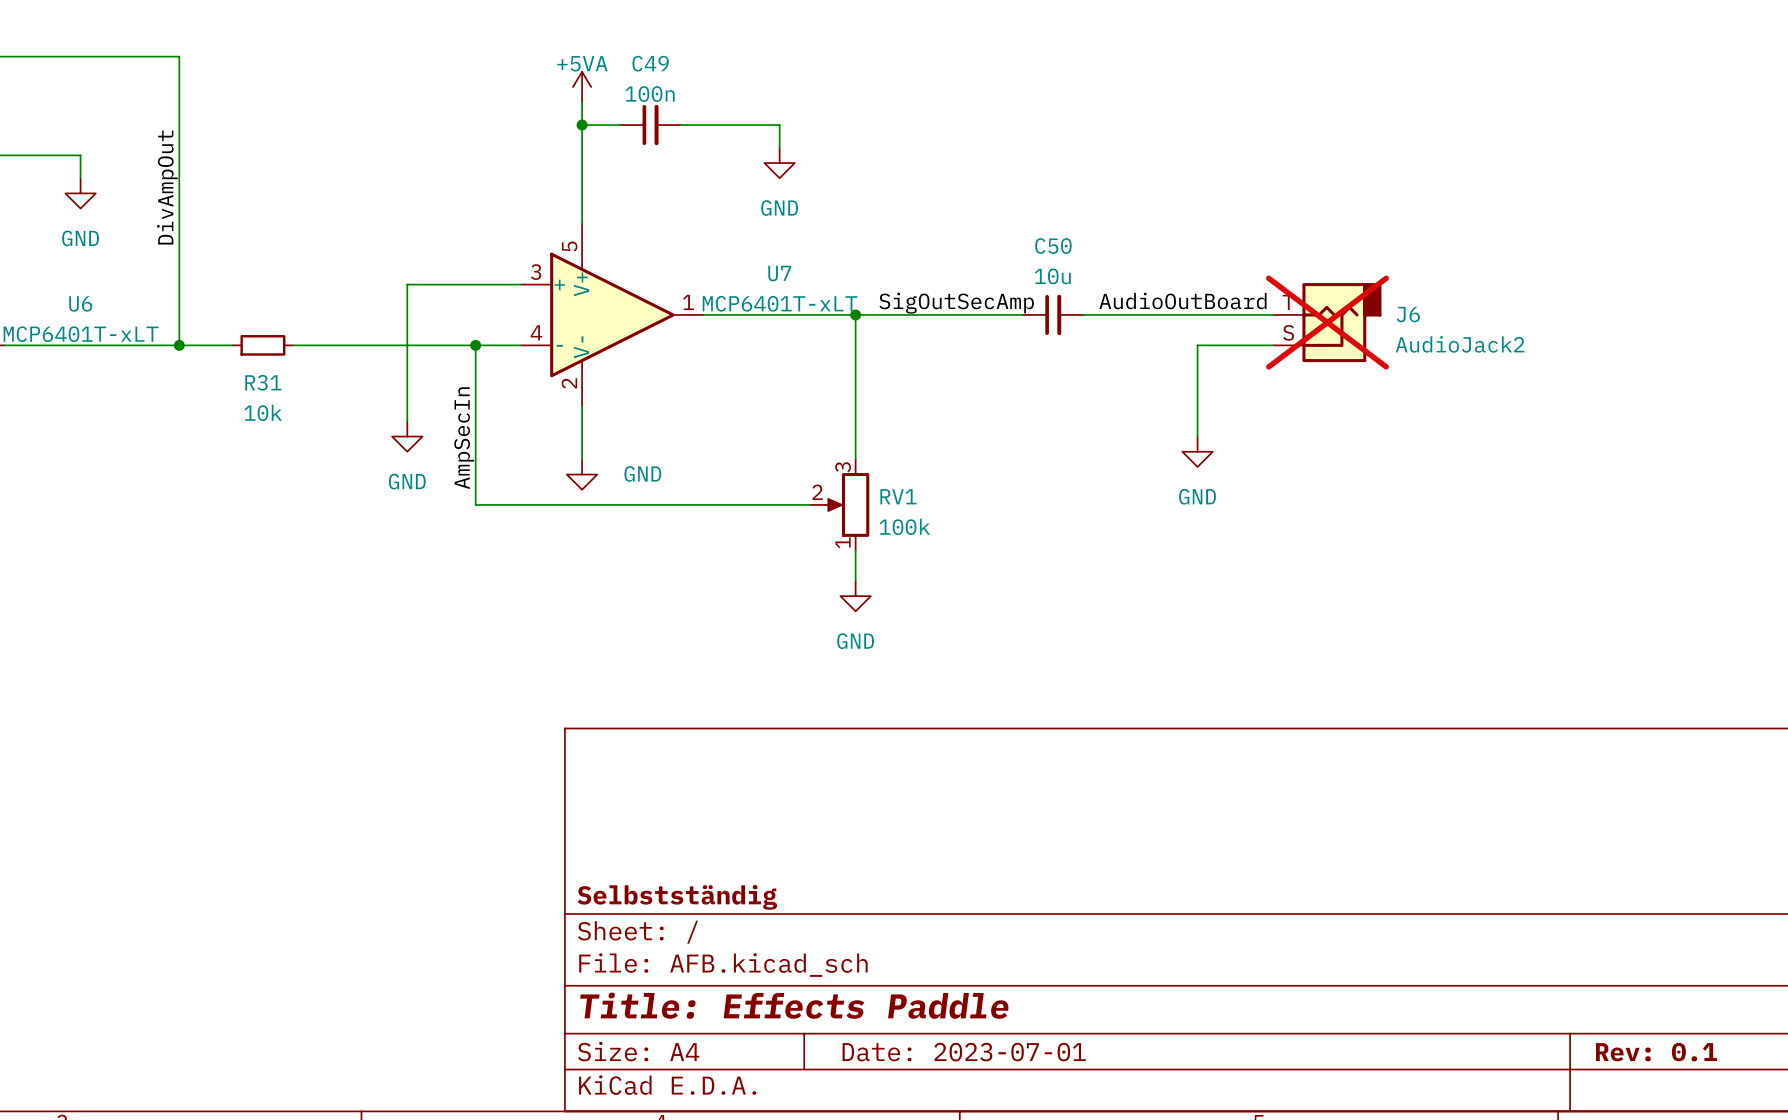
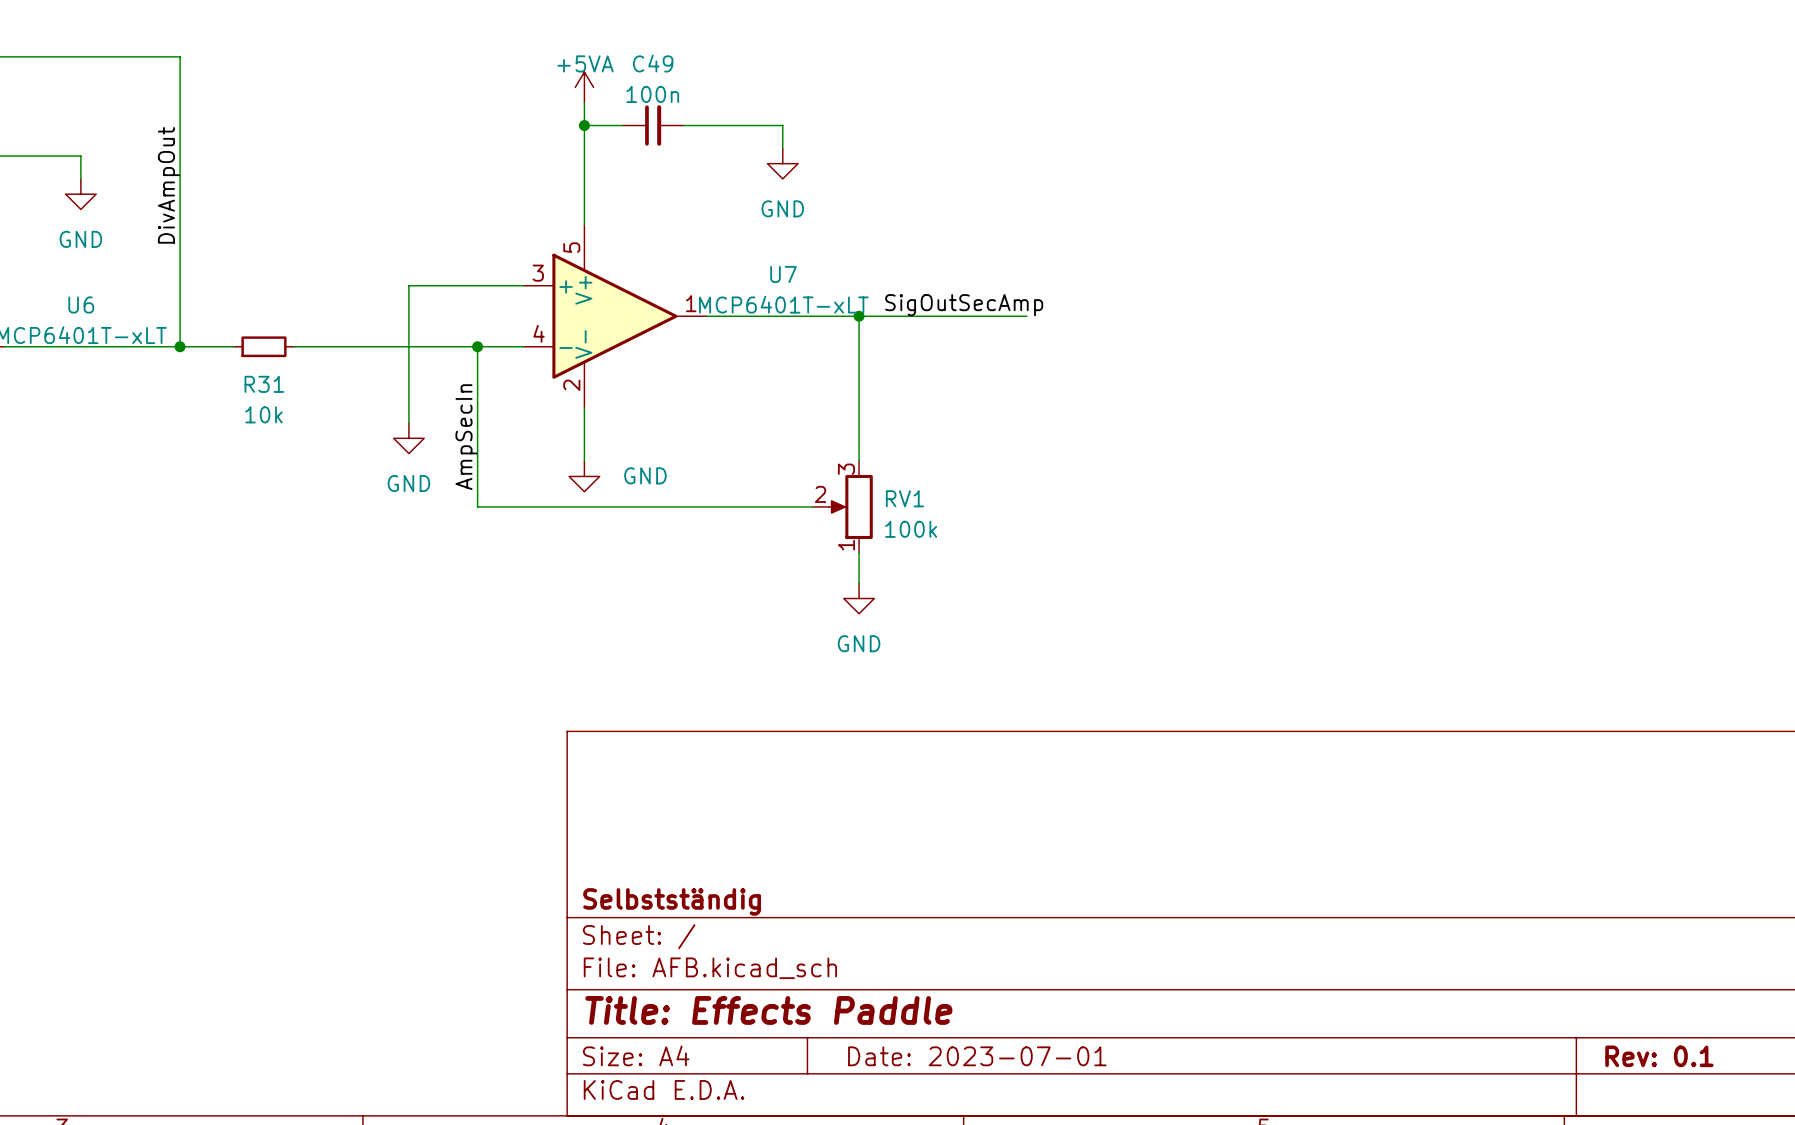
label: AudioOutBoard (1183, 301) -> none
C50: 10u (1053, 314) -> none
wire: (1083, 314) (1273, 314) -> none
J6: AudioJack2 (1327, 322) -> none
wire: (1273, 345) (1197, 345) (1197, 436) -> none
power symbol: GND (1197, 451) -> none

